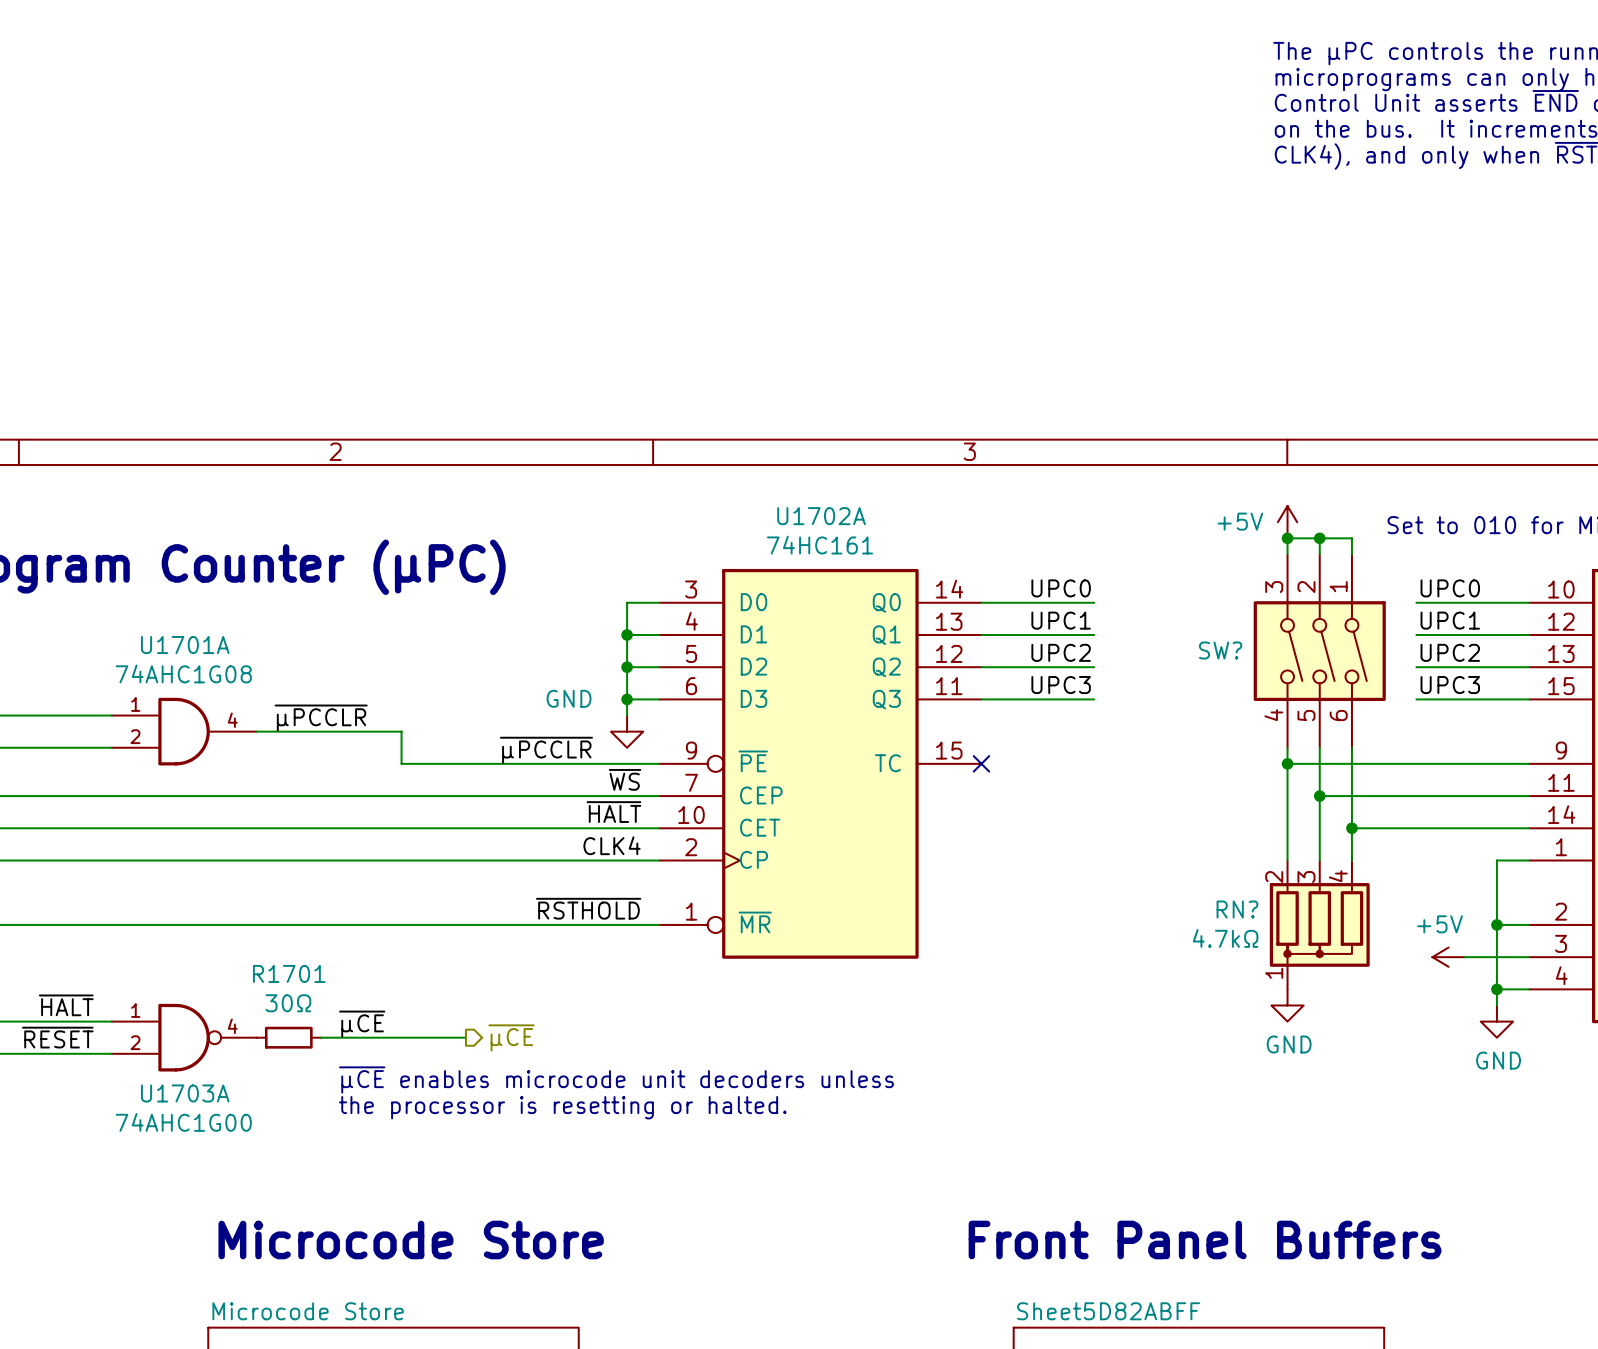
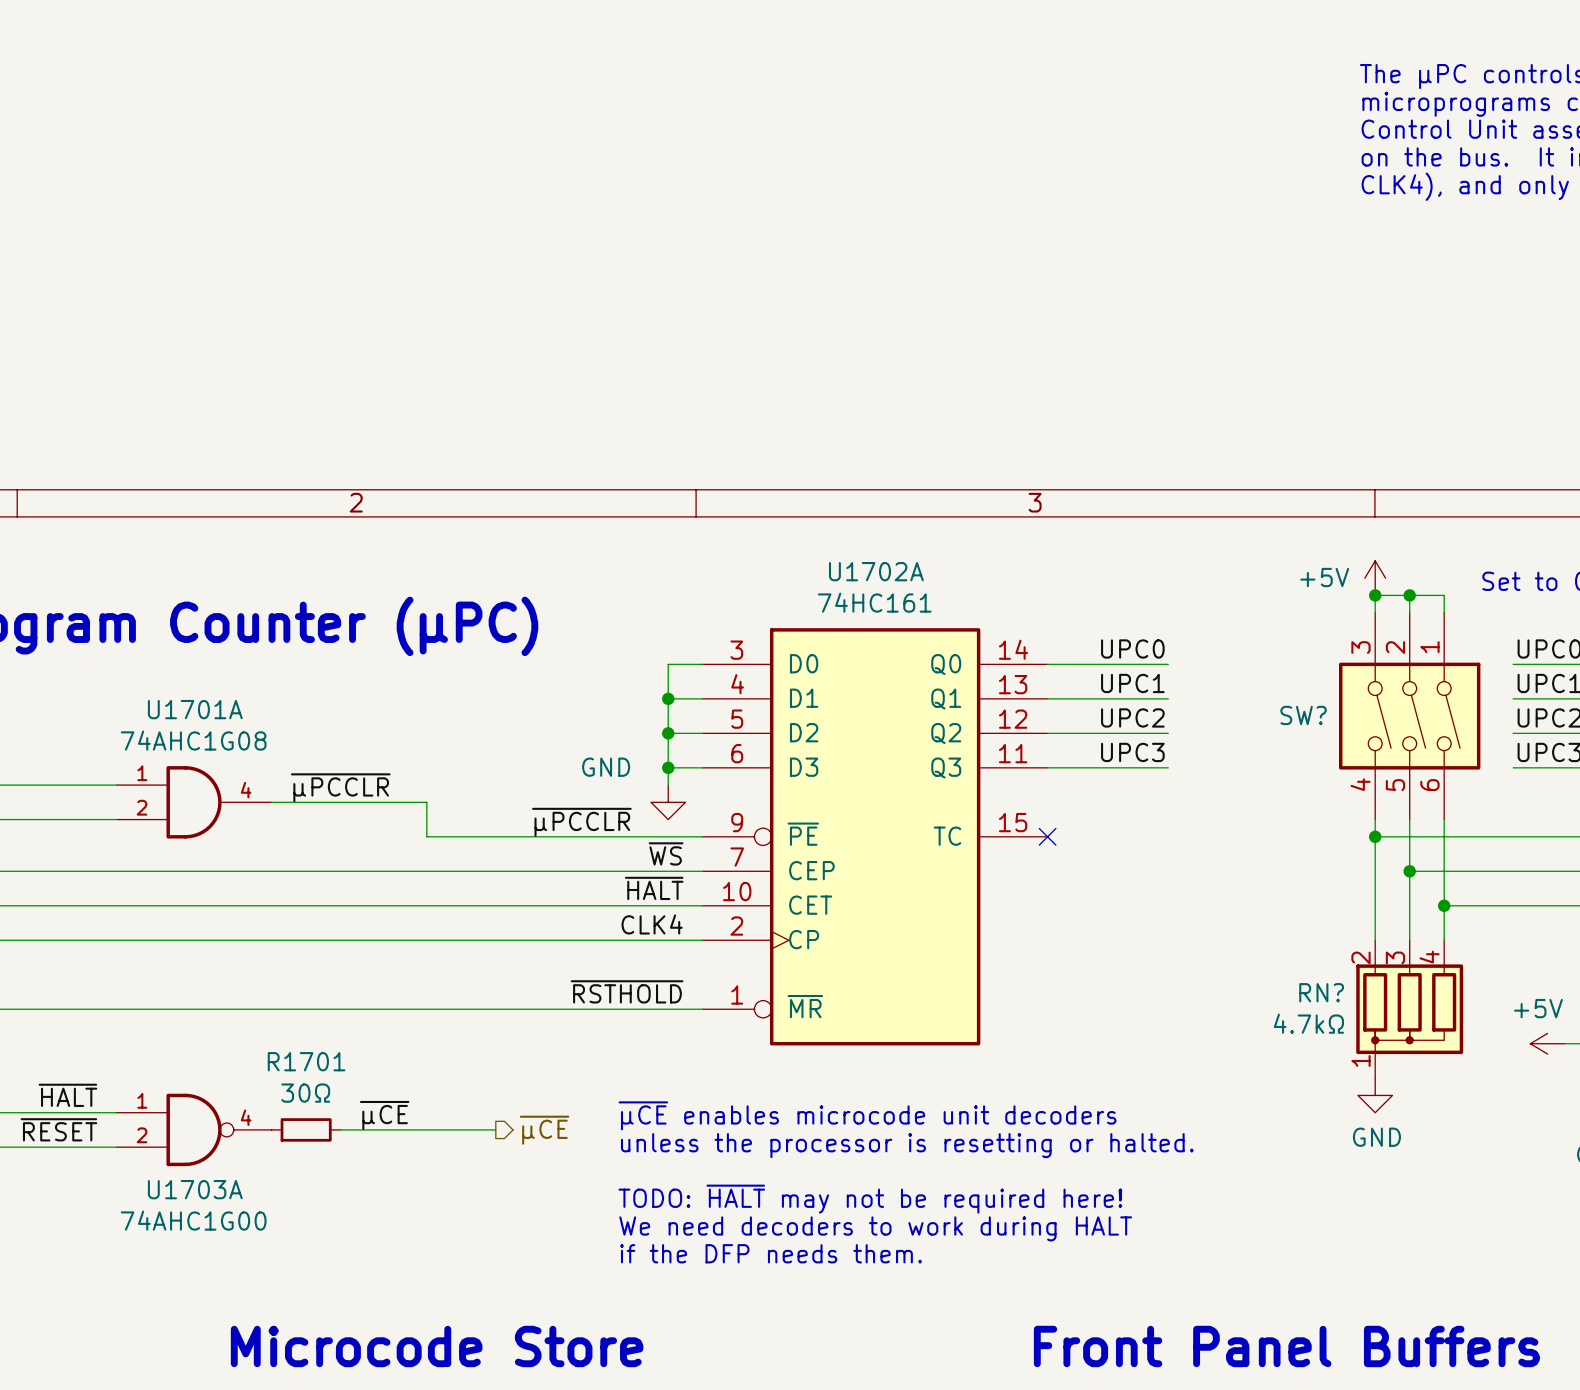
text: none -> ~{µCE} enables microcode unit decoders (867, 1115)
text: none -> unless the processor is resetting or halted. (907, 1145)
text: ~{µCE} enables microcode unit decoders unless (616, 1079) -> none
text: none -> TODO: ~{HALT} may not be required here! (870, 1199)
text: the processor is resetting or halted. (562, 1107) -> none
text: none -> We need decoders to work during HALT (875, 1228)
text: none -> if the DFP needs them. (771, 1253)

